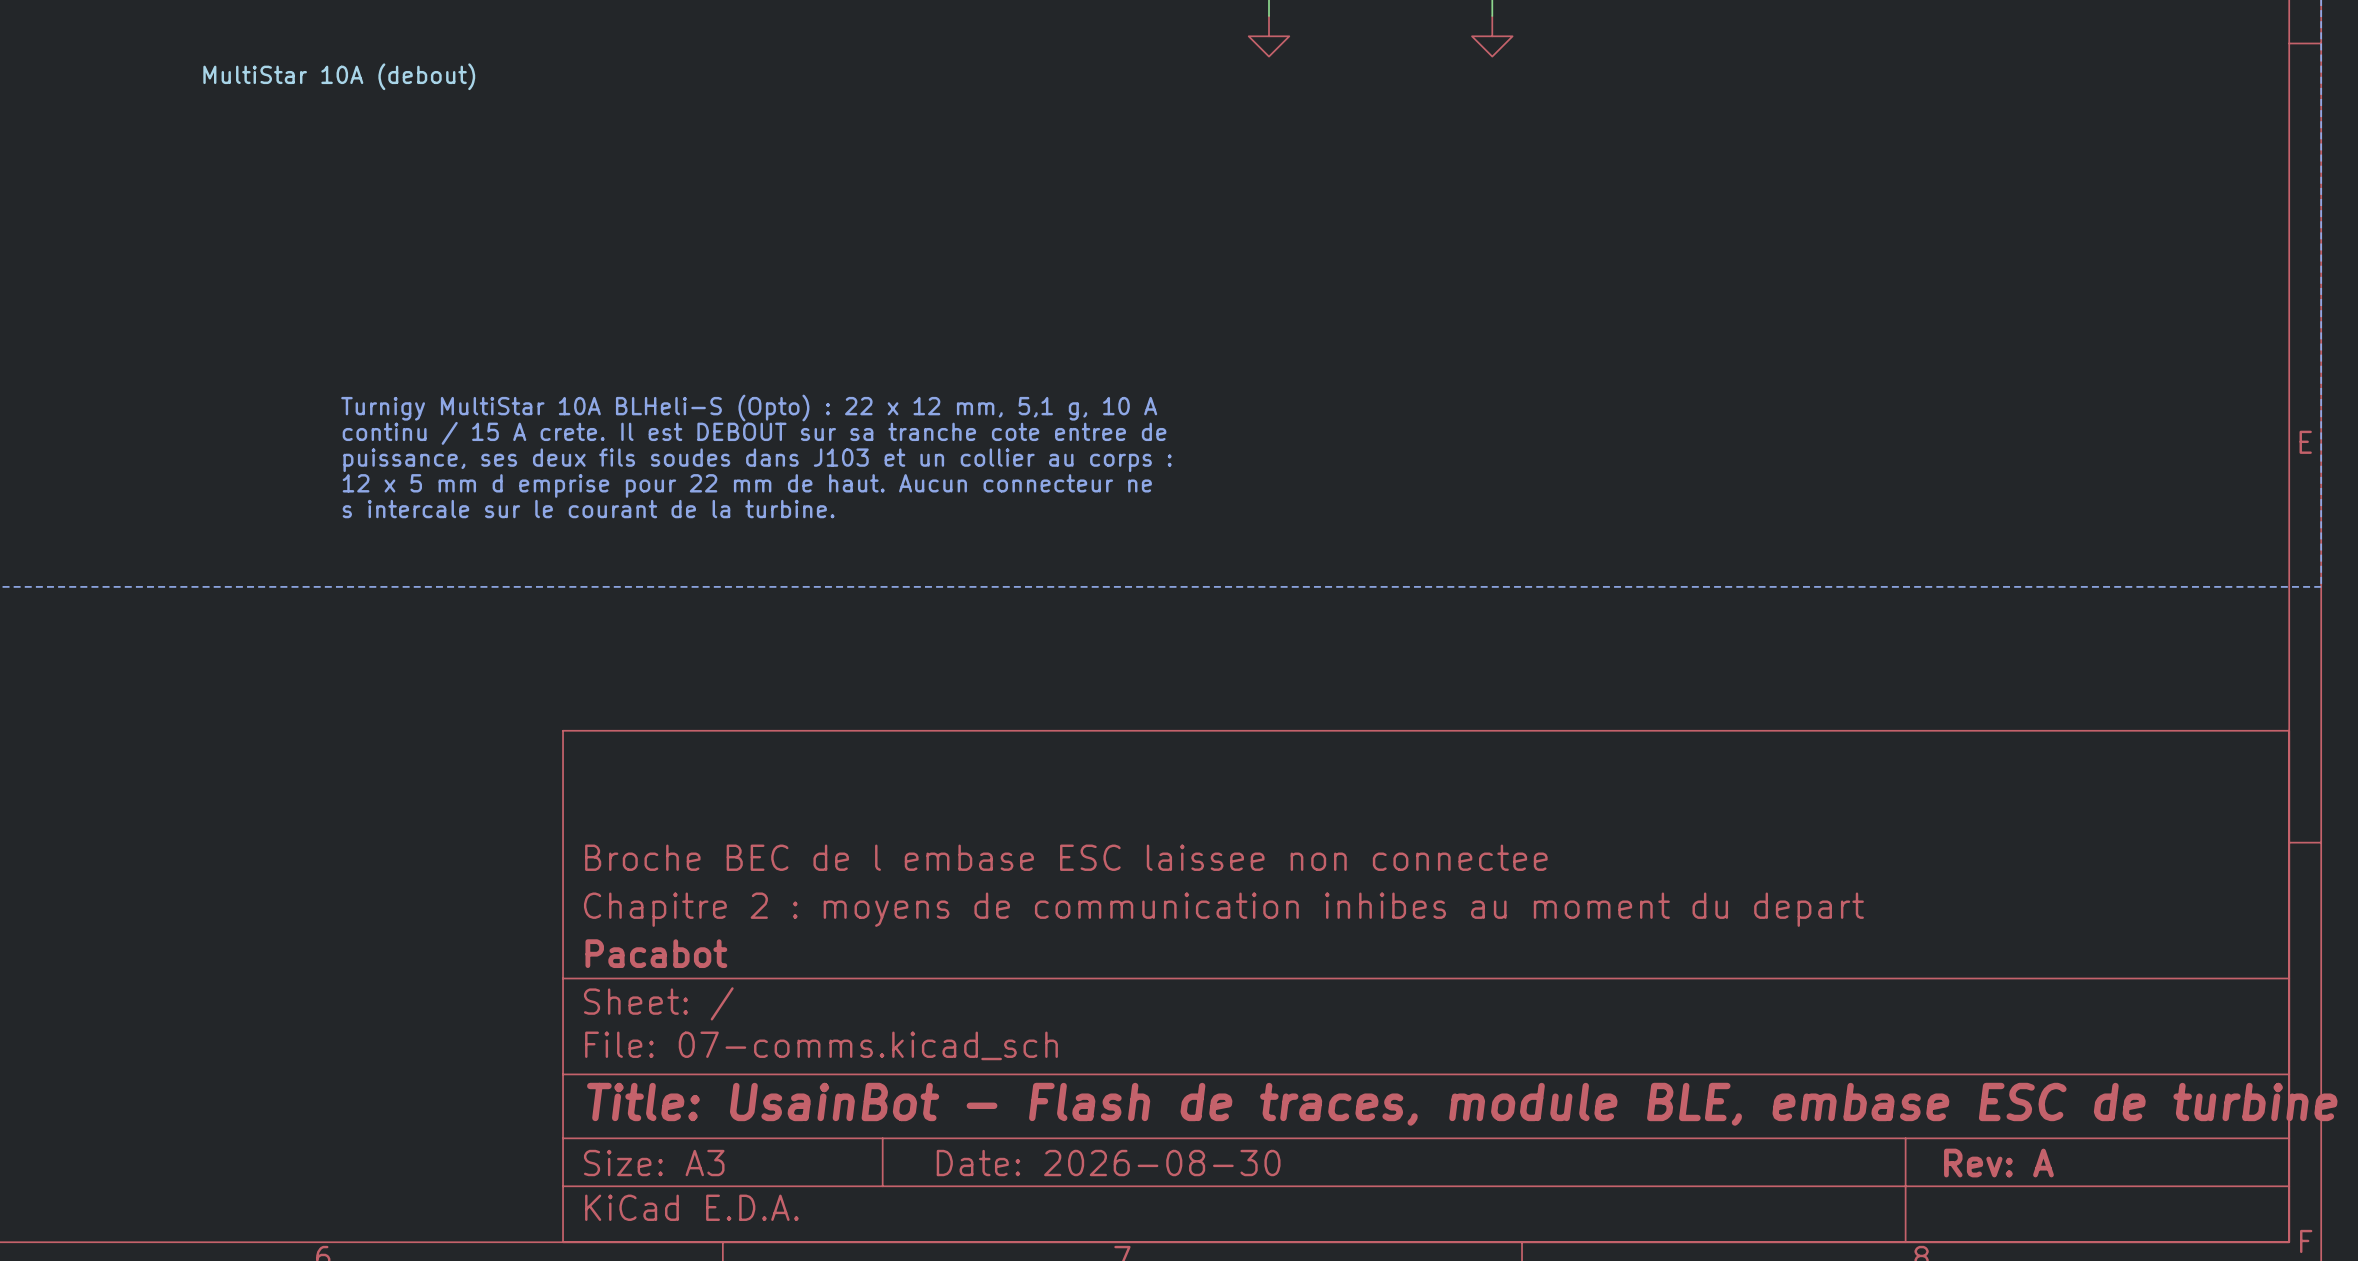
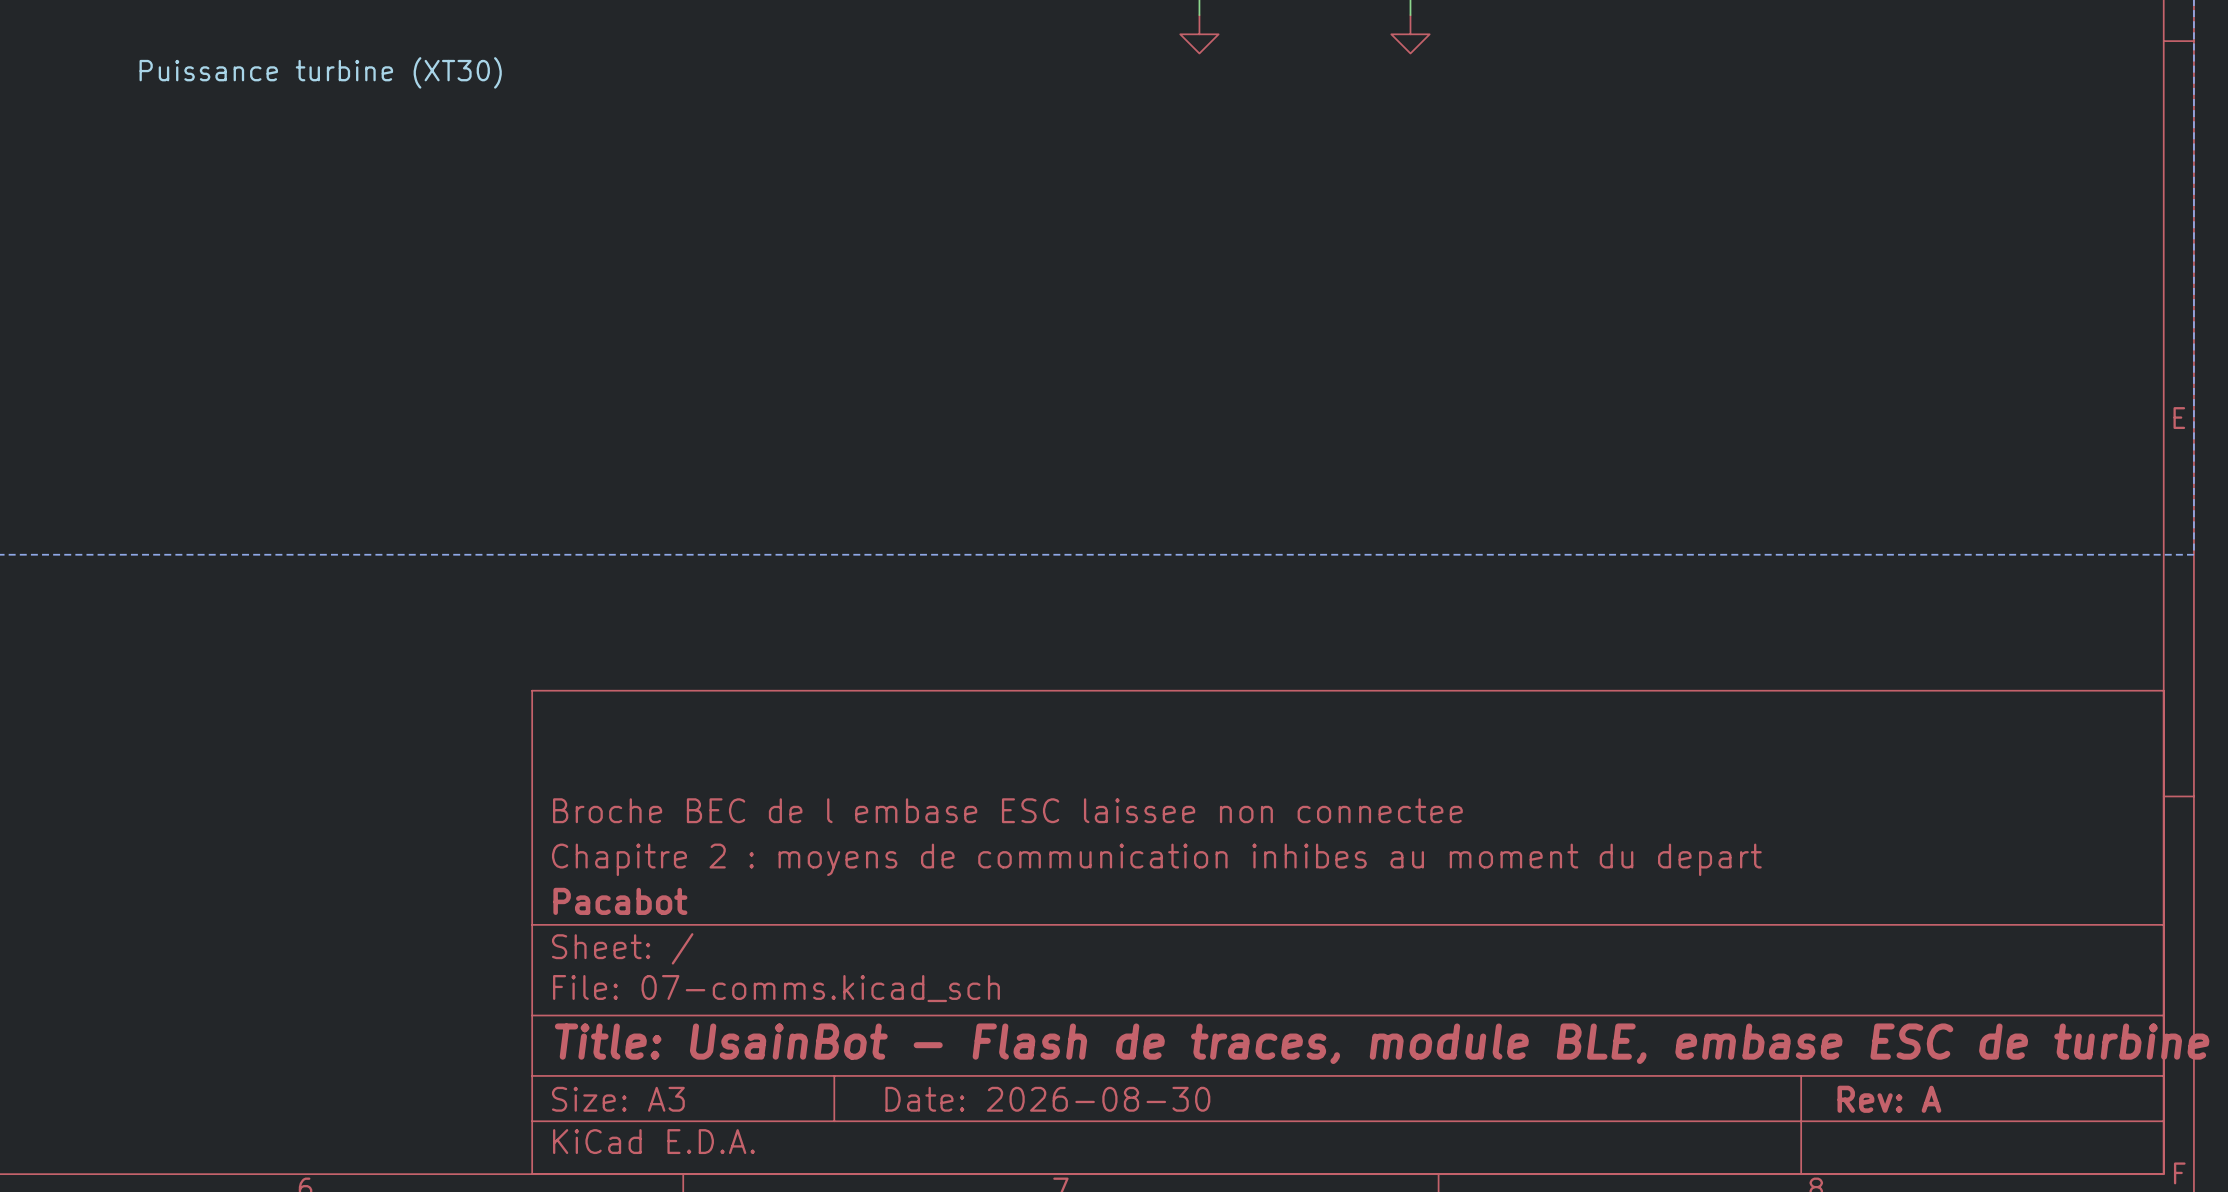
part value: MultiStar 10A (debout) (339, 76) -> Puissance turbine (XT30) (320, 72)
text: Turnigy MultiStar 10A BLHeli-S (Opto) : 22 x 12 mm, 5,1 g, 10 A (749, 408) -> none
text: continu / 15 A crete. Il est DEBOUT sur sa tranche cote entree de (754, 433) -> none
text: puissance, ses deux fils soudes dans J103 et un collier au corps : (757, 460) -> none
text: 12 x 5 mm d emprise pour 22 mm de haut. Aucun connecteur ne (747, 485) -> none
text: s intercale sur le courant de la turbine. (588, 509) -> none

